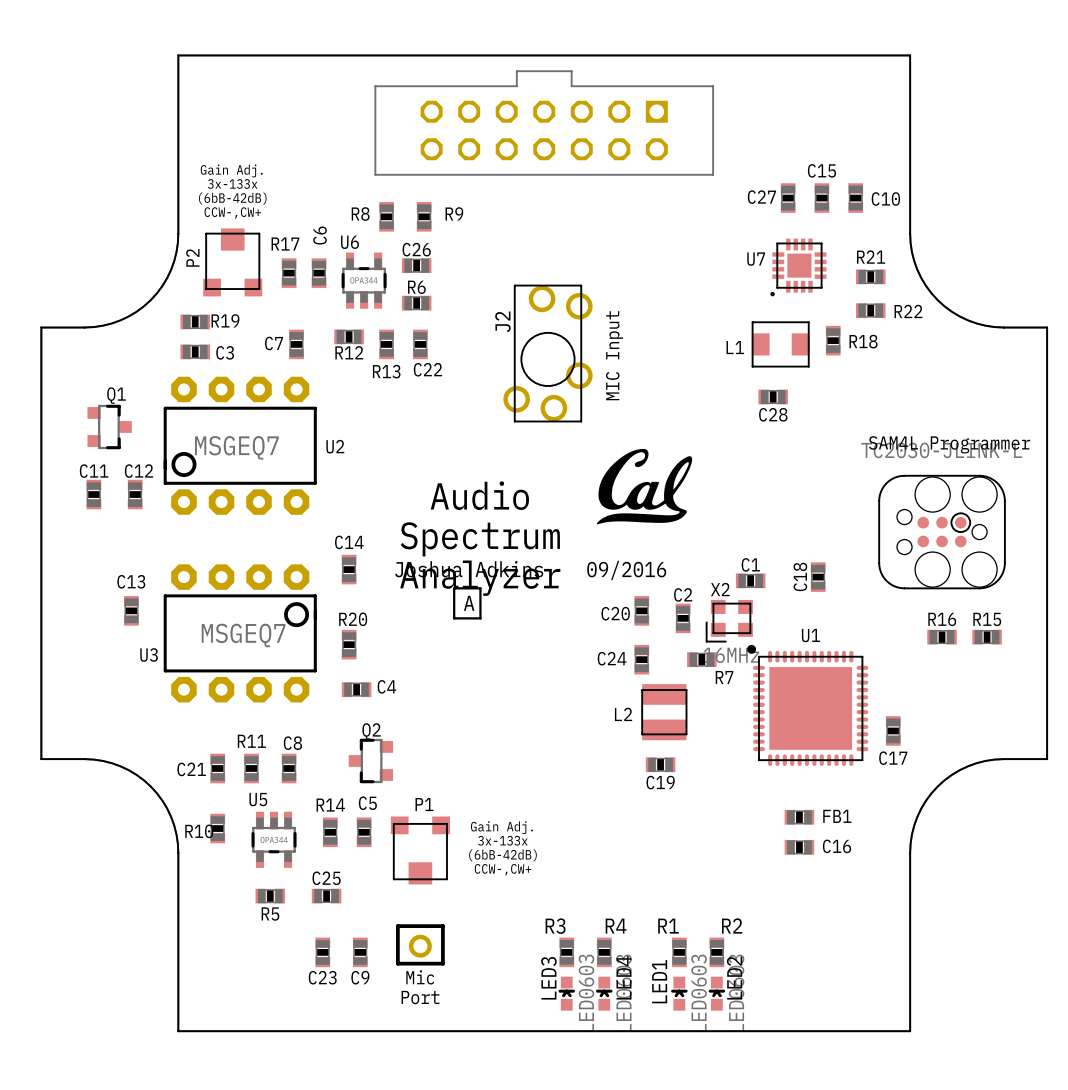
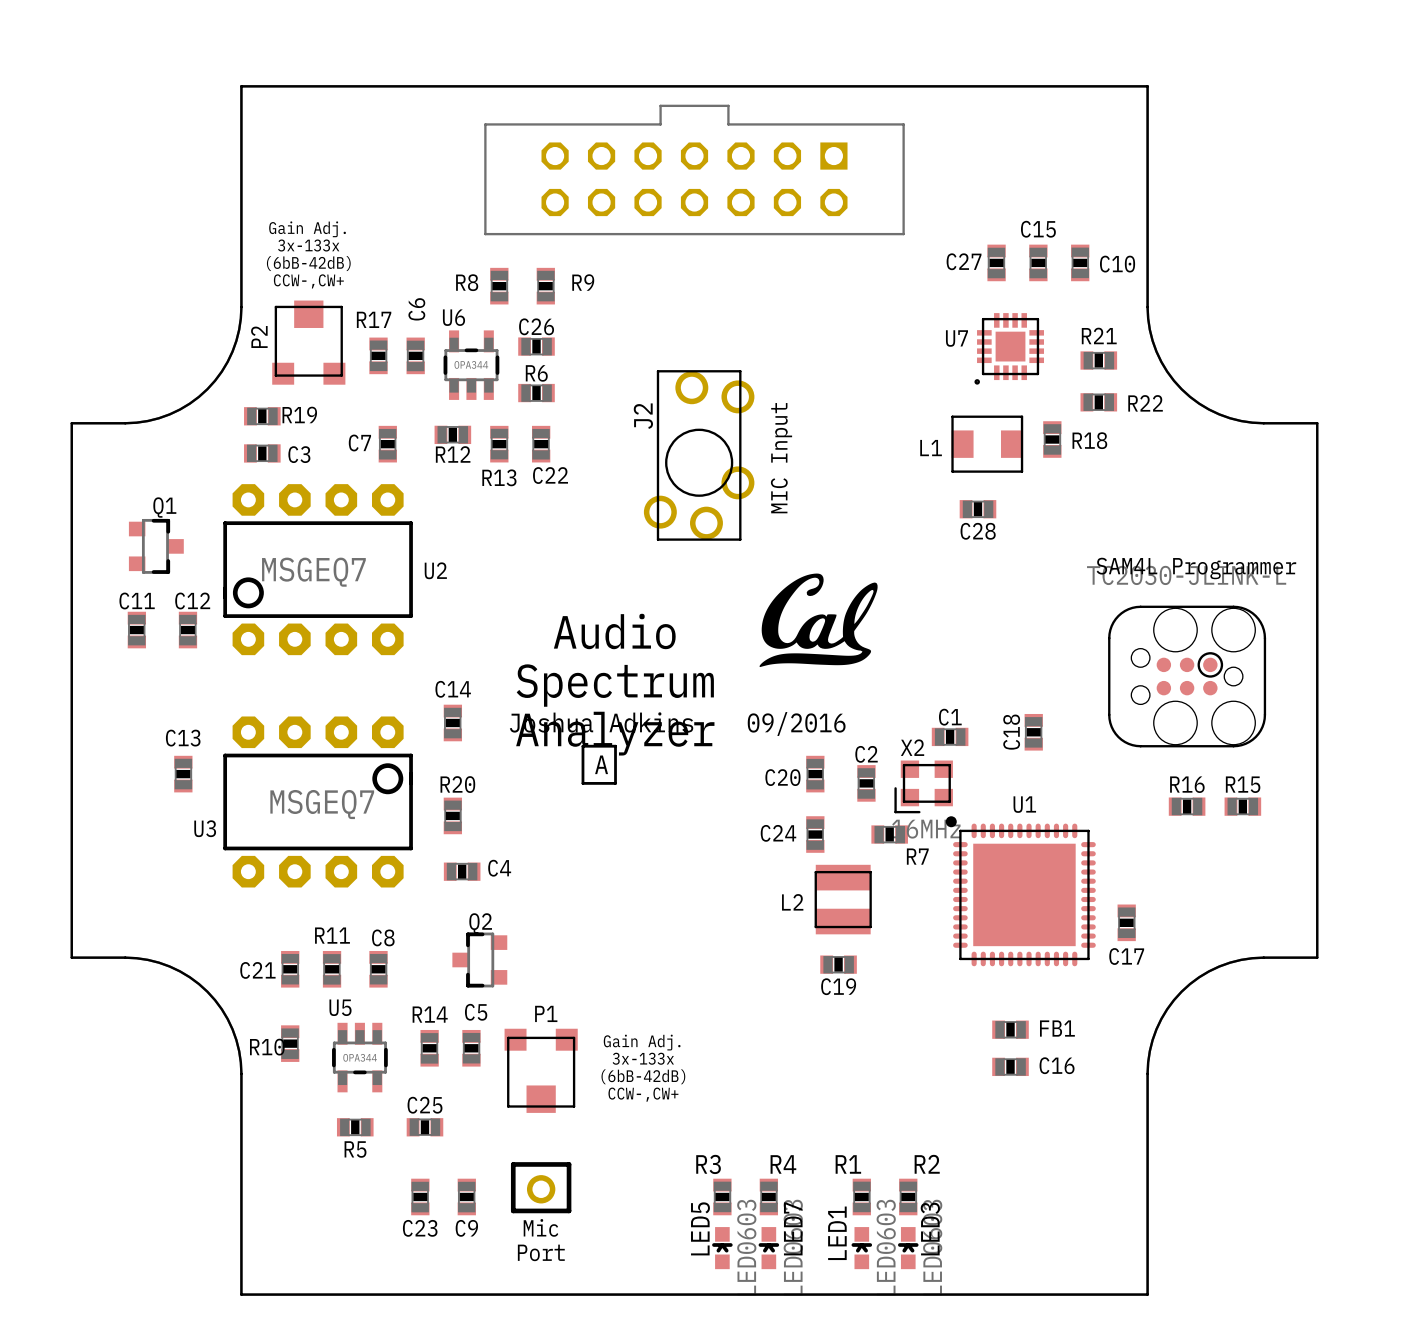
LED4 name: LED4 (623, 977) -> LED7 (793, 1228)
LED3 name: LED3 (548, 978) -> LED5 (700, 1228)
LED2 name: LED2 (734, 978) -> LED3 (930, 1229)

